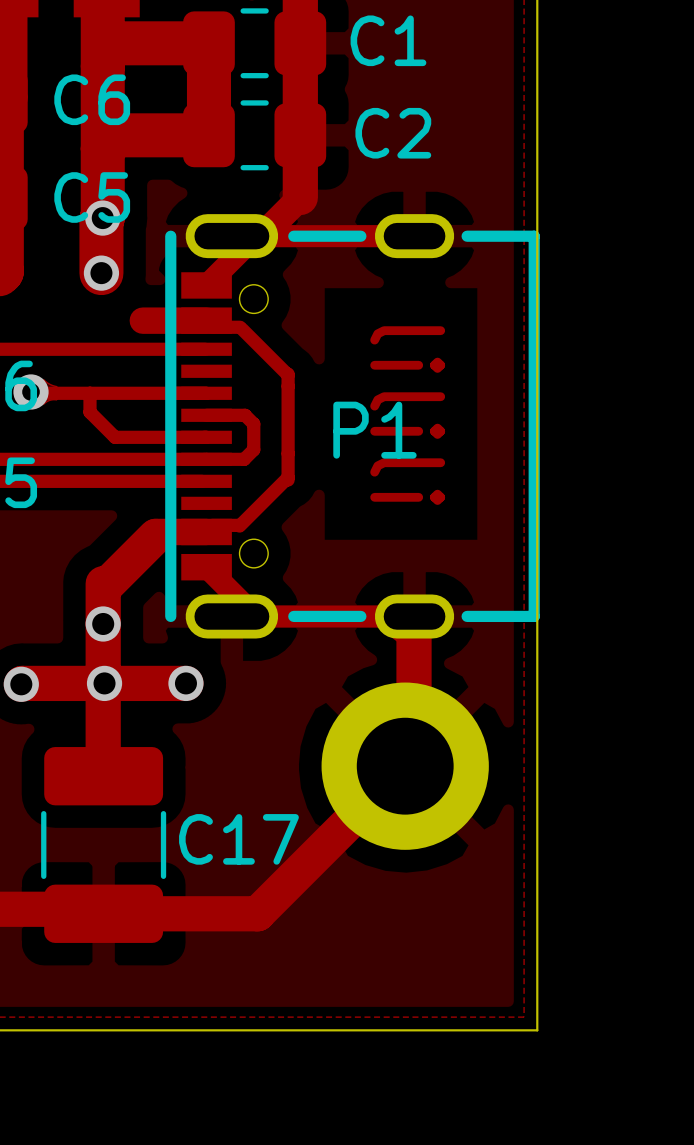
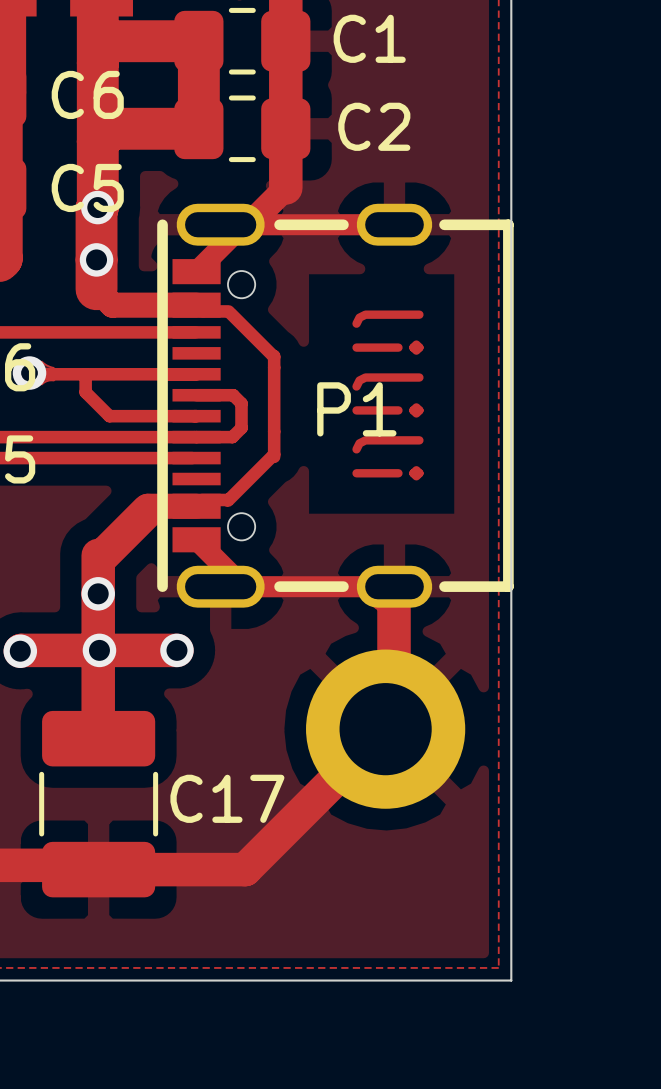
track: none -> (96, 259) (96, 289) (112, 305) (135, 305)

